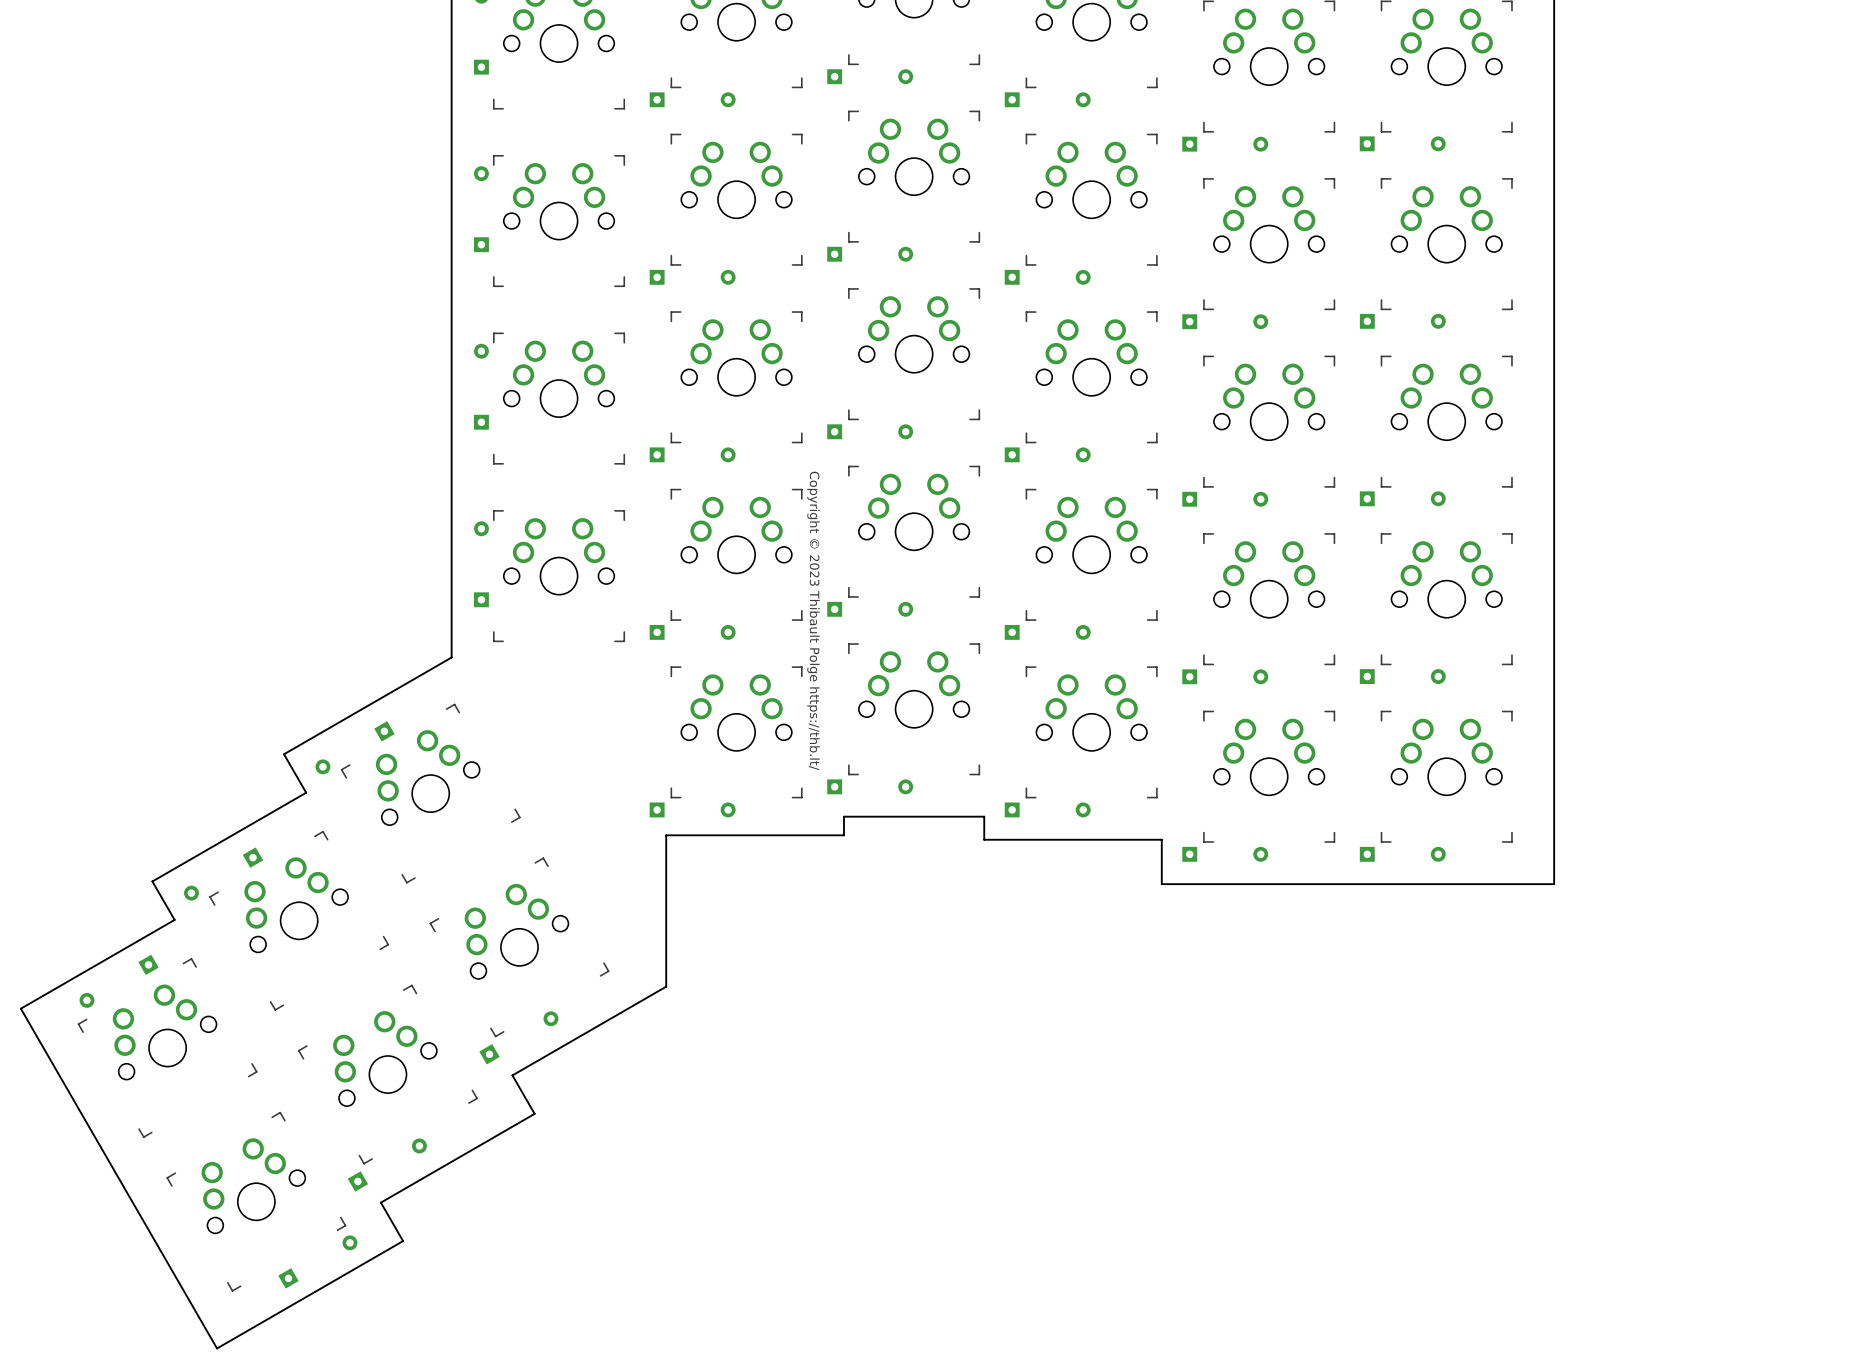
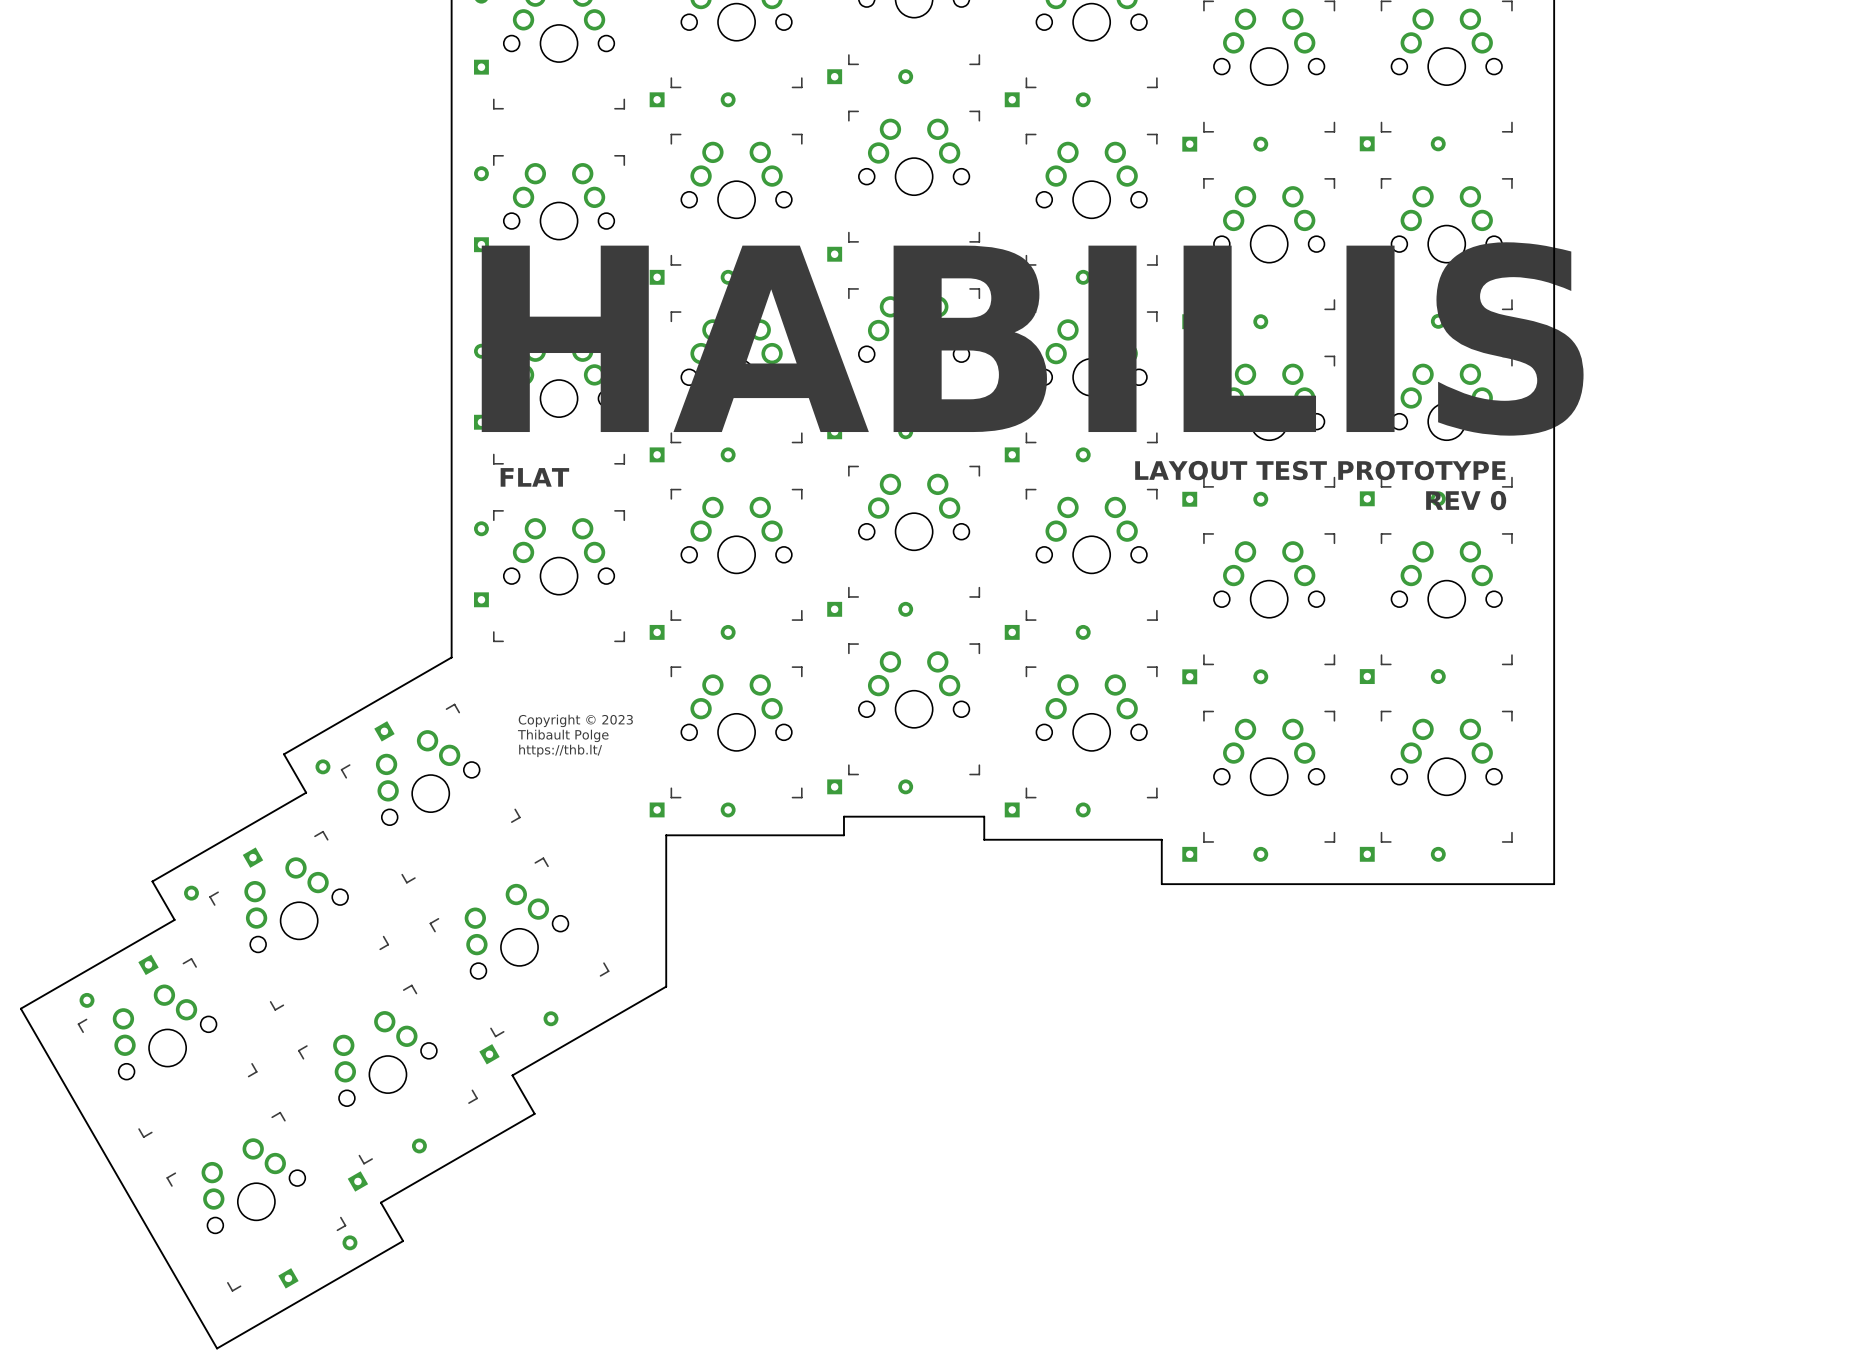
text: none -> HABILIS (1032, 338)
text: none -> LAYOUT TEST PROTOTYPE (1320, 470)
text: none -> FLAT (534, 477)
text: none -> REV 0 (1466, 500)
text: Copyright © 2023 Thibault Polge https://thb.lt/ (813, 620) -> none
text: none -> Copyright © 2023 (575, 720)
text: none -> Thibault Polge (563, 735)
text: none -> https://thb.lt/ (560, 750)

